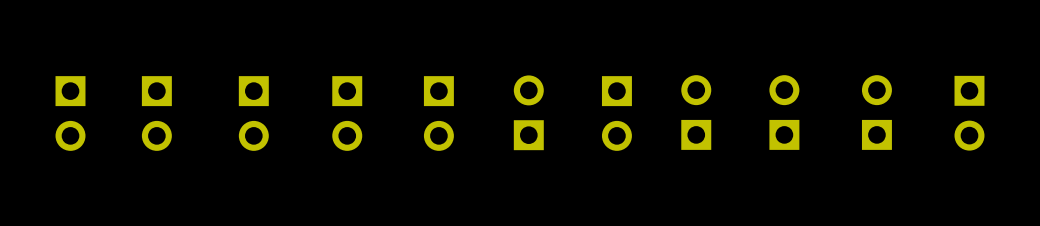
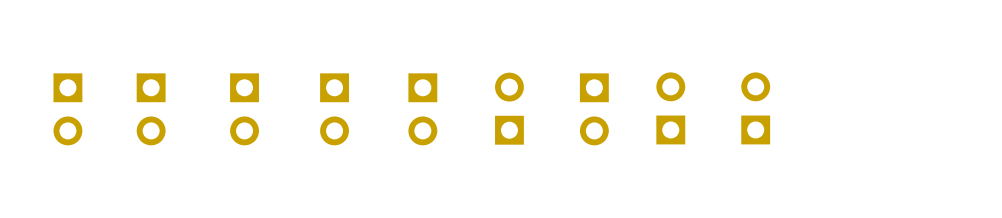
part: (876, 112) -> none
part: (969, 113) -> none

